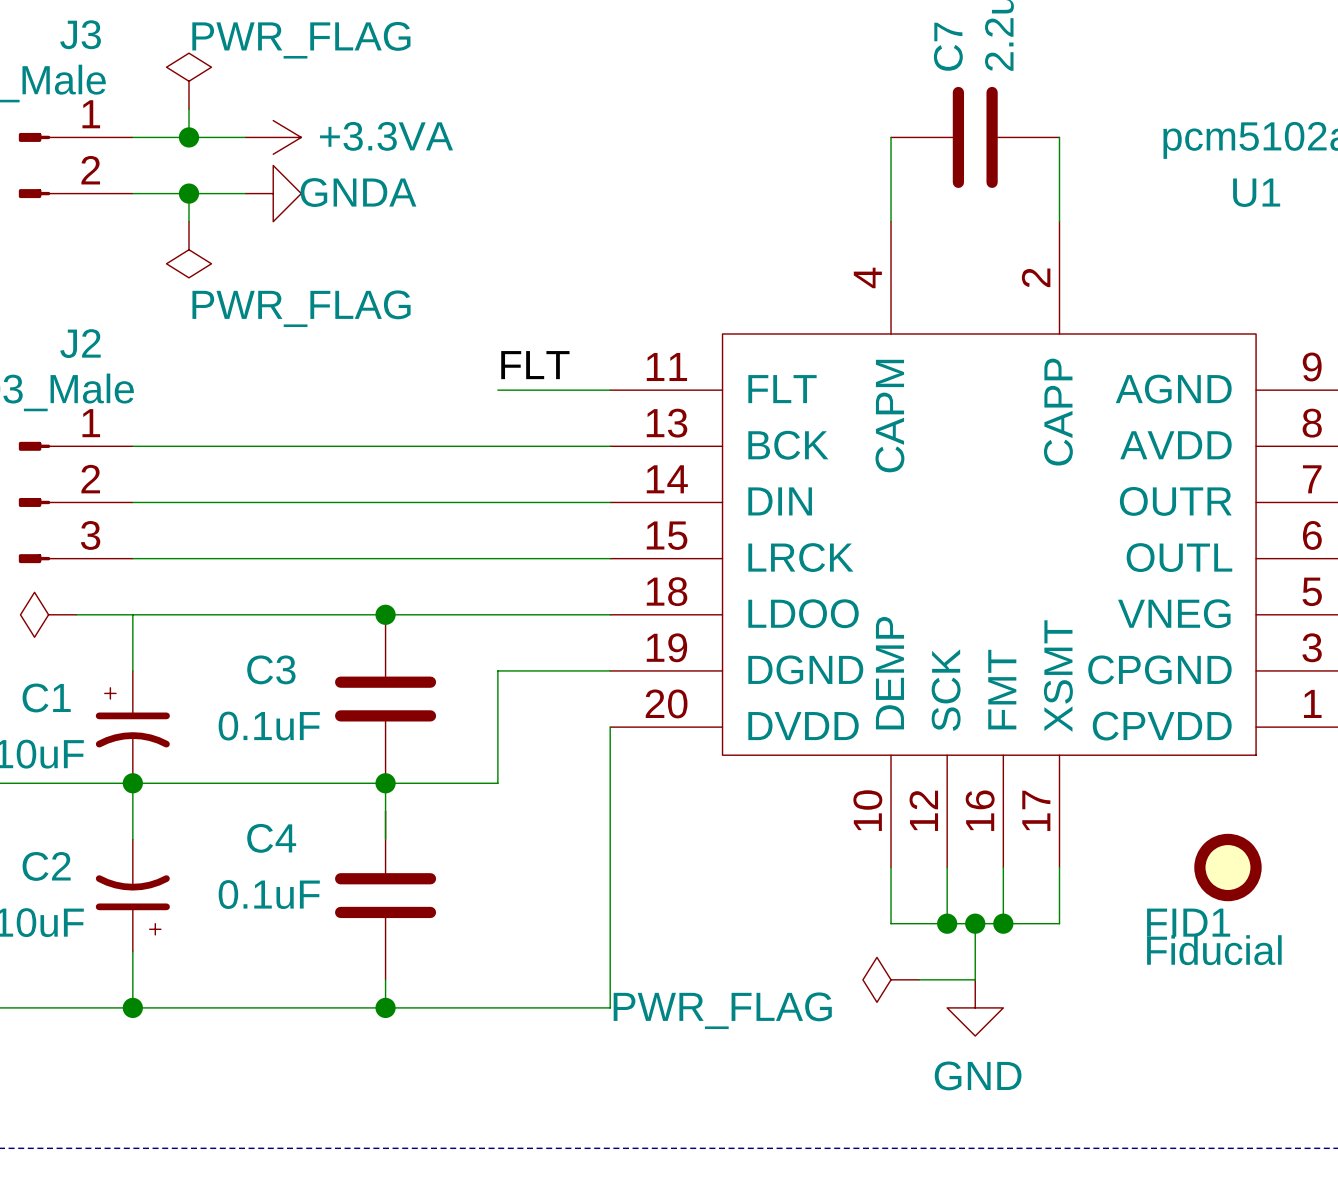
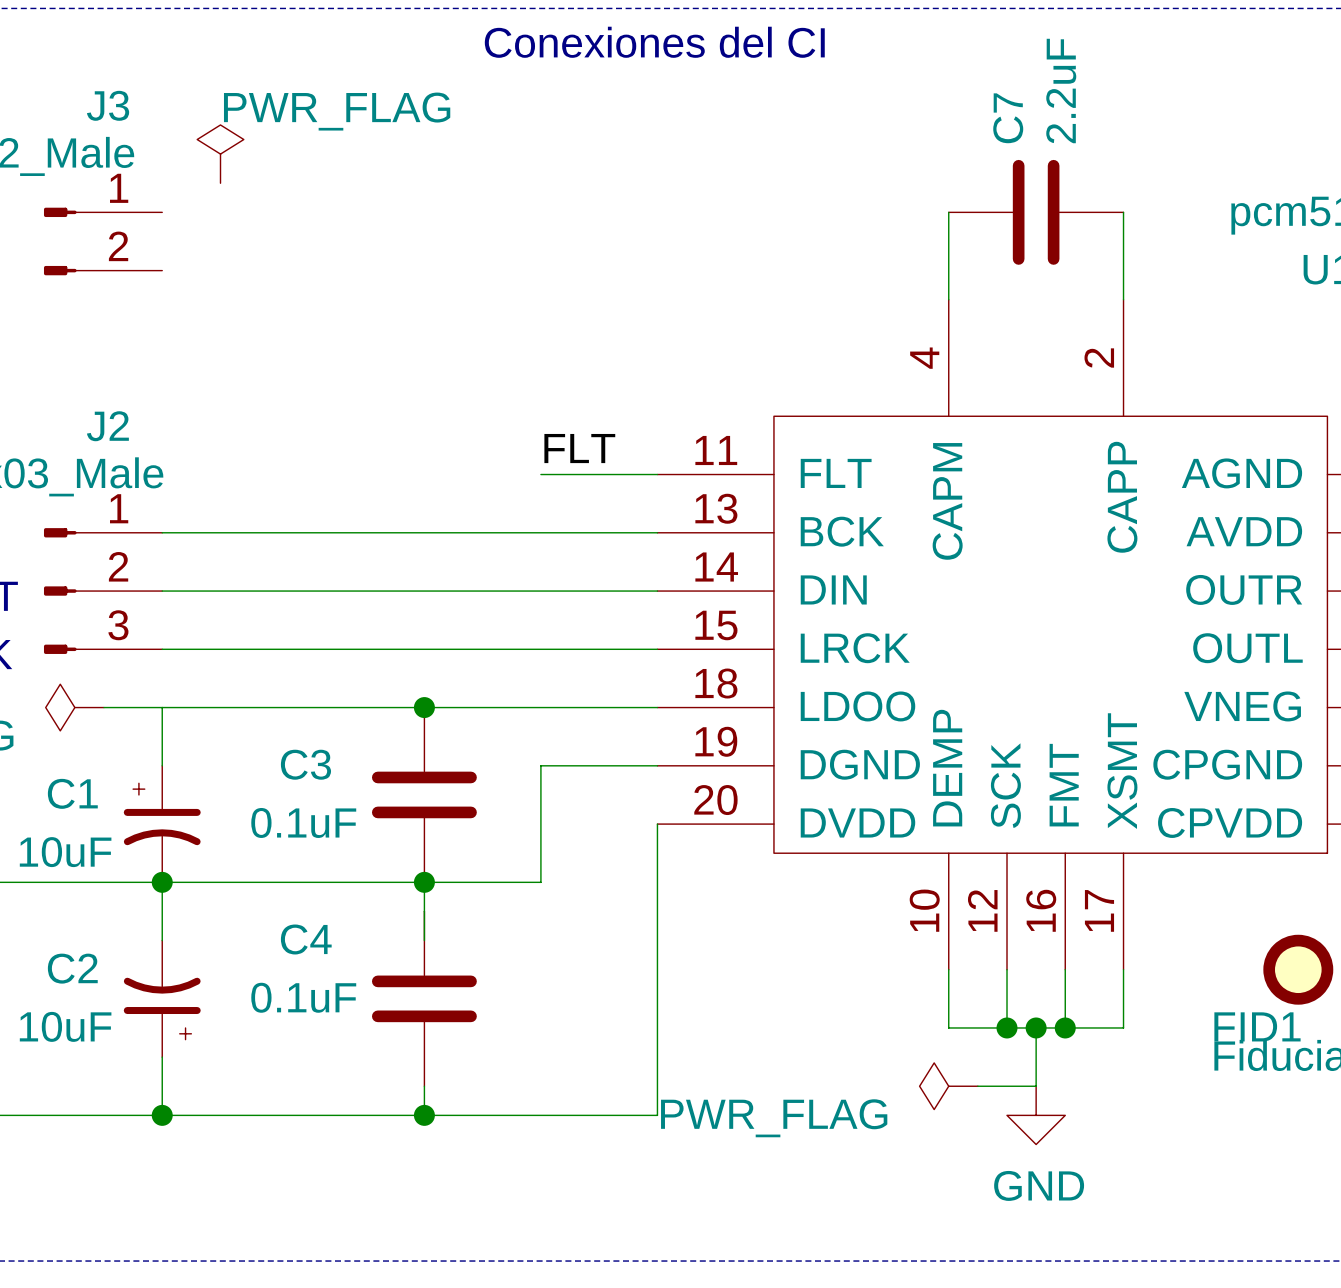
wire: (189, 109) (189, 137) -> none
wire: (132, 137) (245, 137) -> none
junction: (189, 137) -> none
power symbol: +3.3VA (273, 137) -> none
wire: (132, 193) (245, 193) -> none
wire: (189, 193) (189, 221) -> none
junction: (189, 193) -> none
power symbol: GNDA (273, 193) -> none
power symbol: PWR_FLAG (189, 249) -> none

